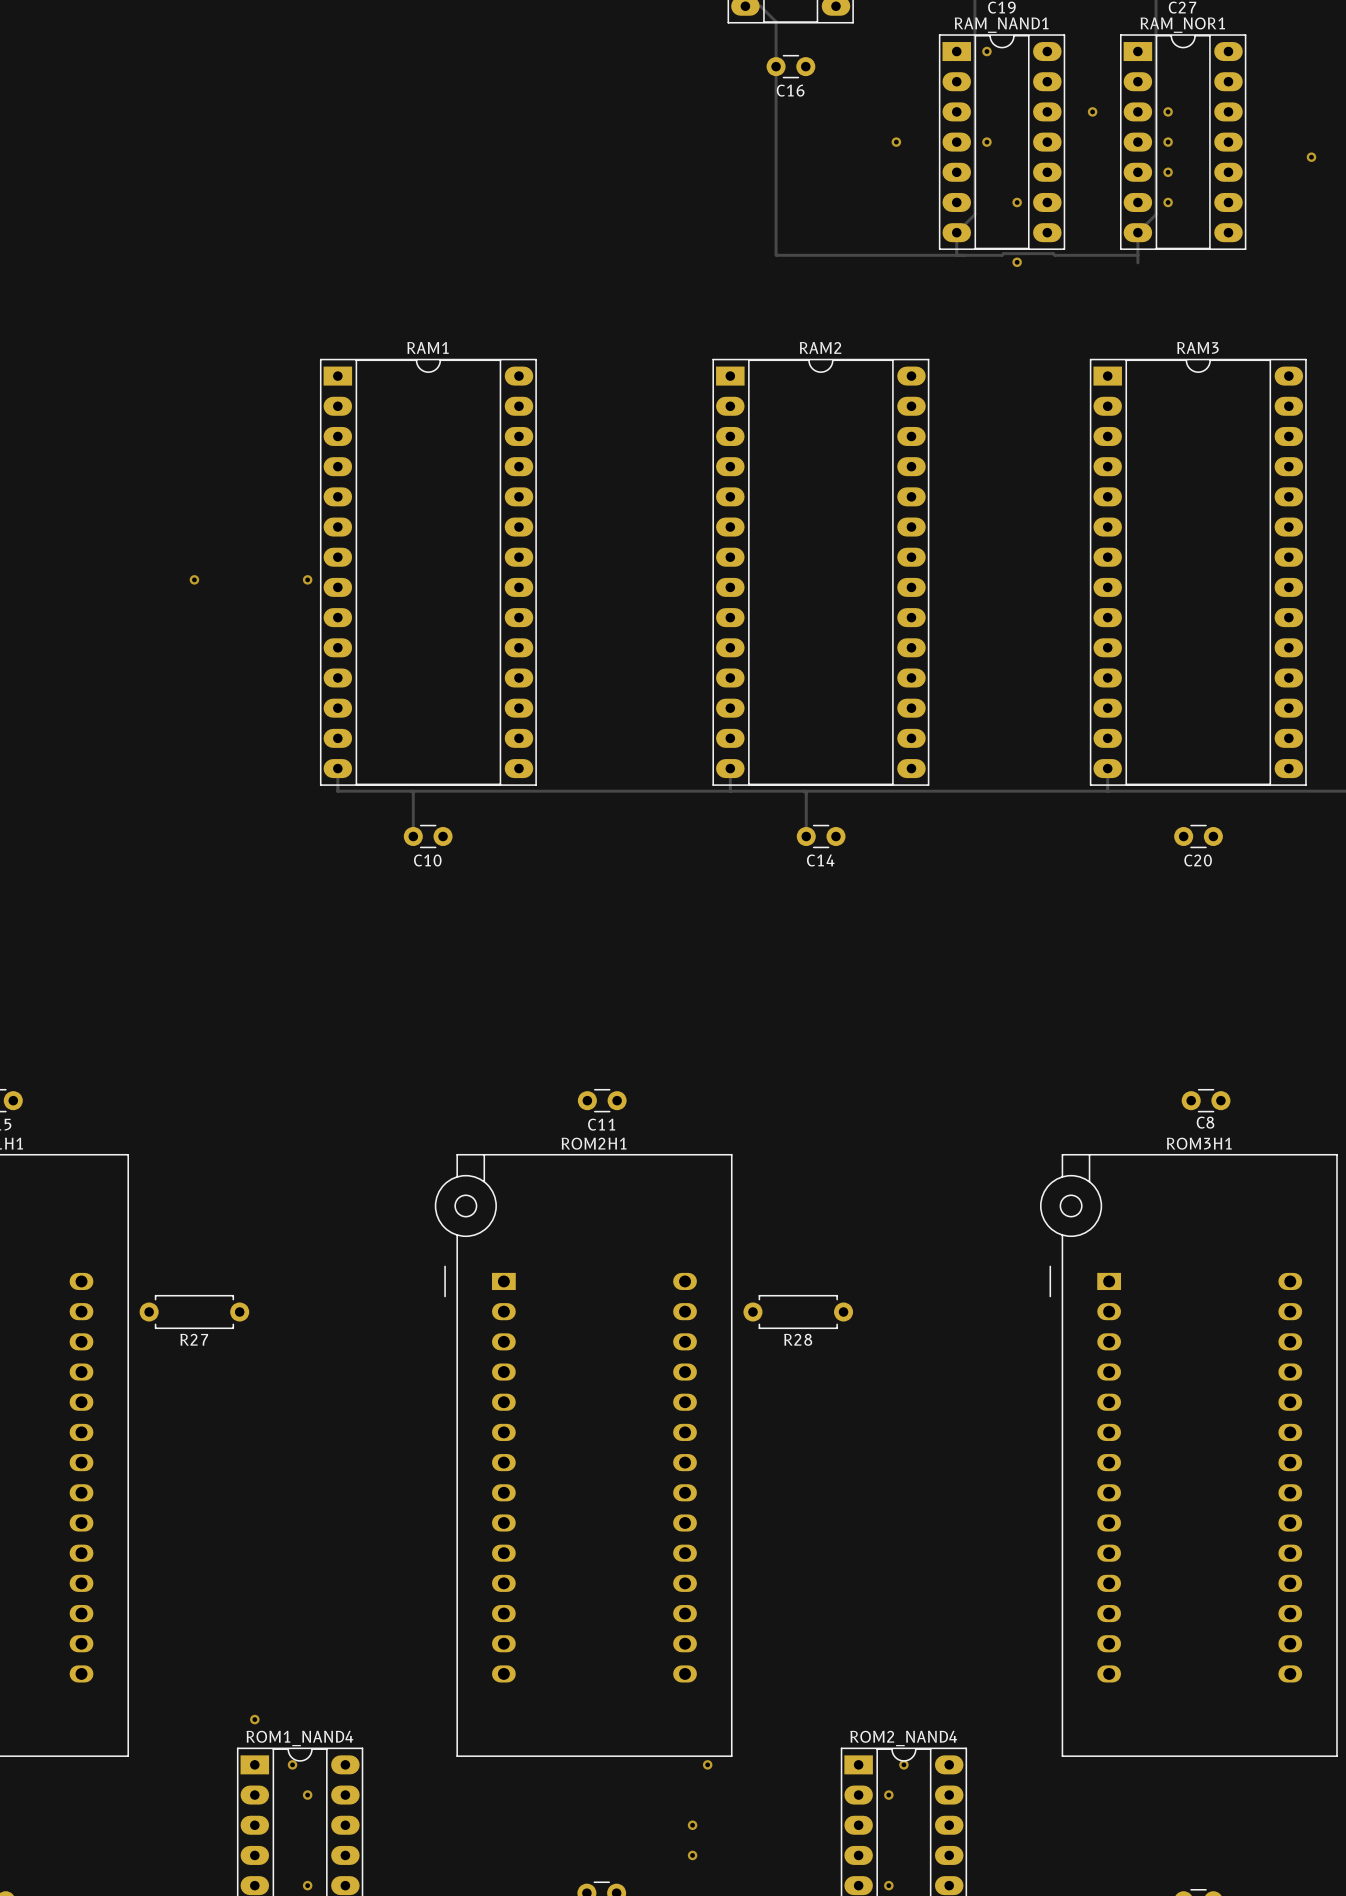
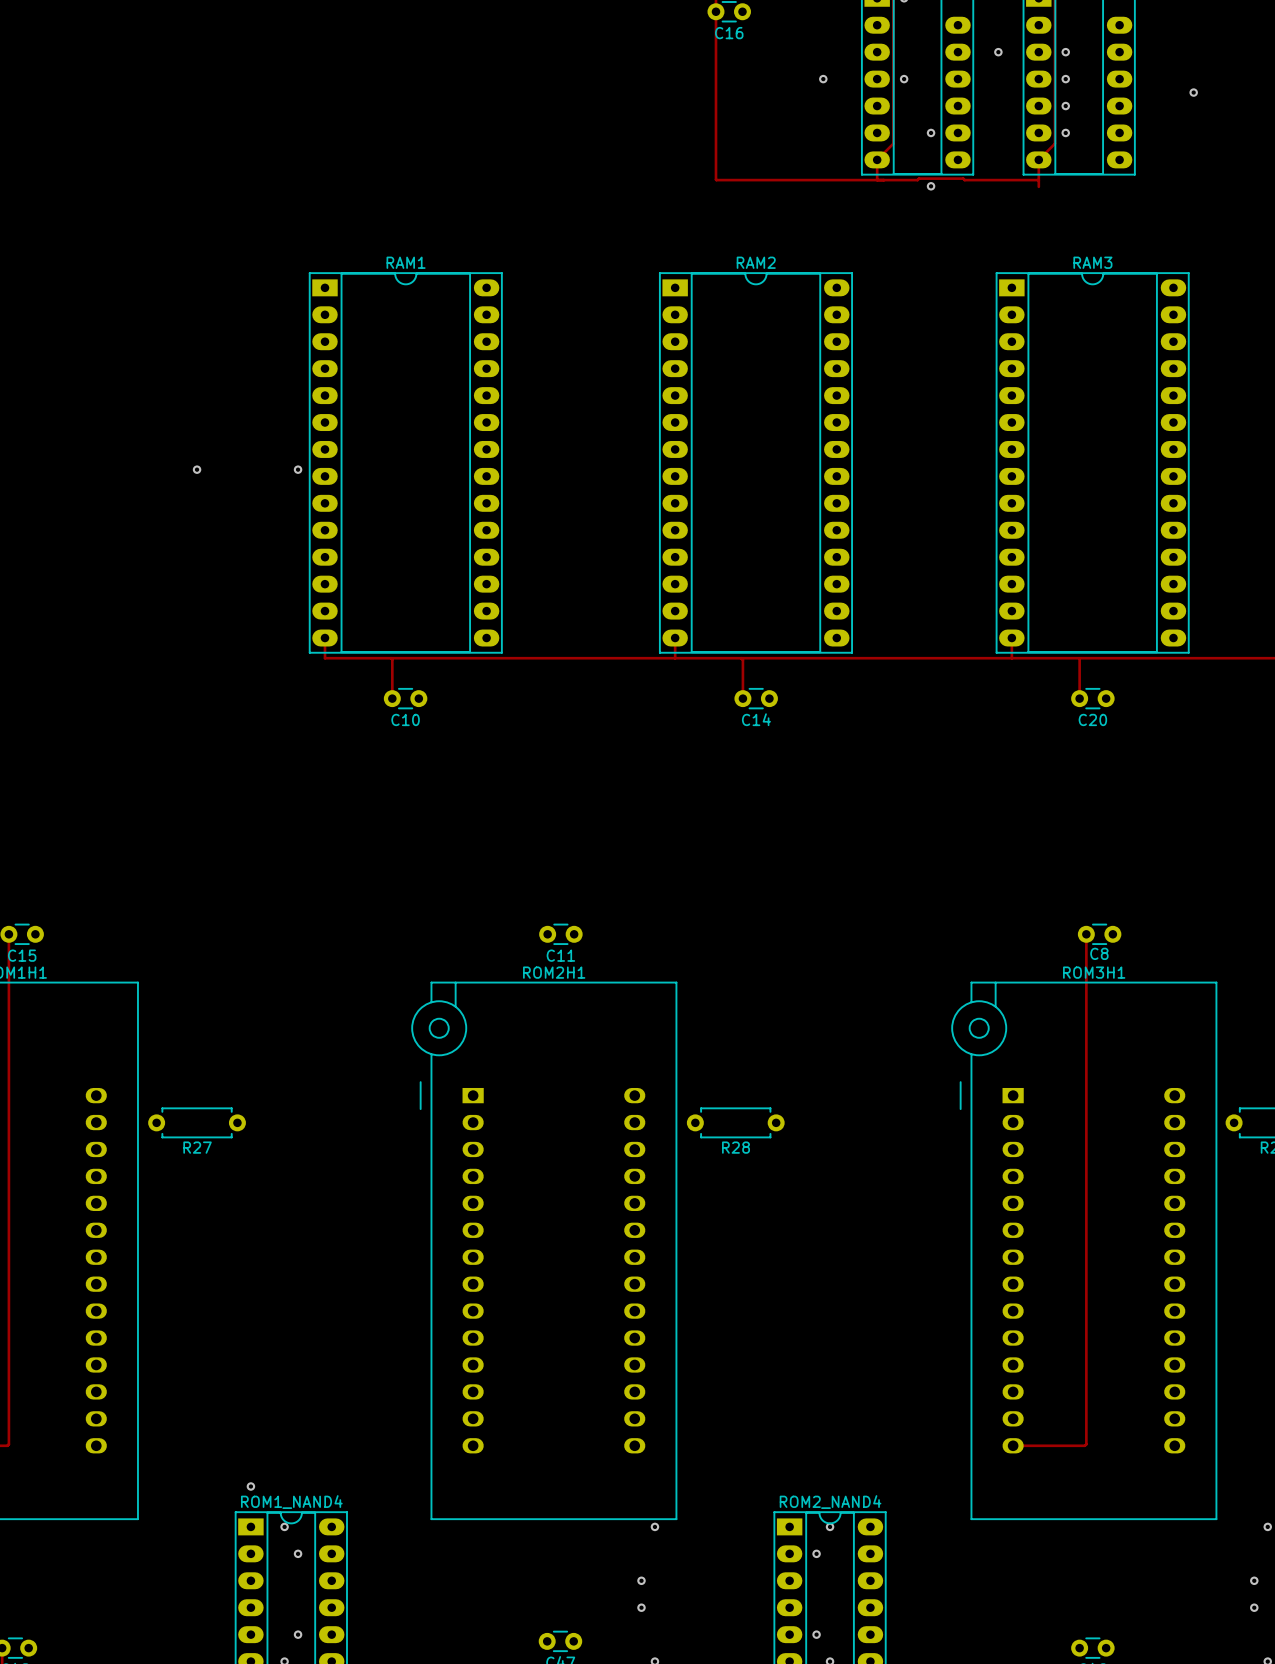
track: none -> (1079, 659) (1079, 698)
track: none -> (1086, 934) (1086, 1444) (1013, 1445)

